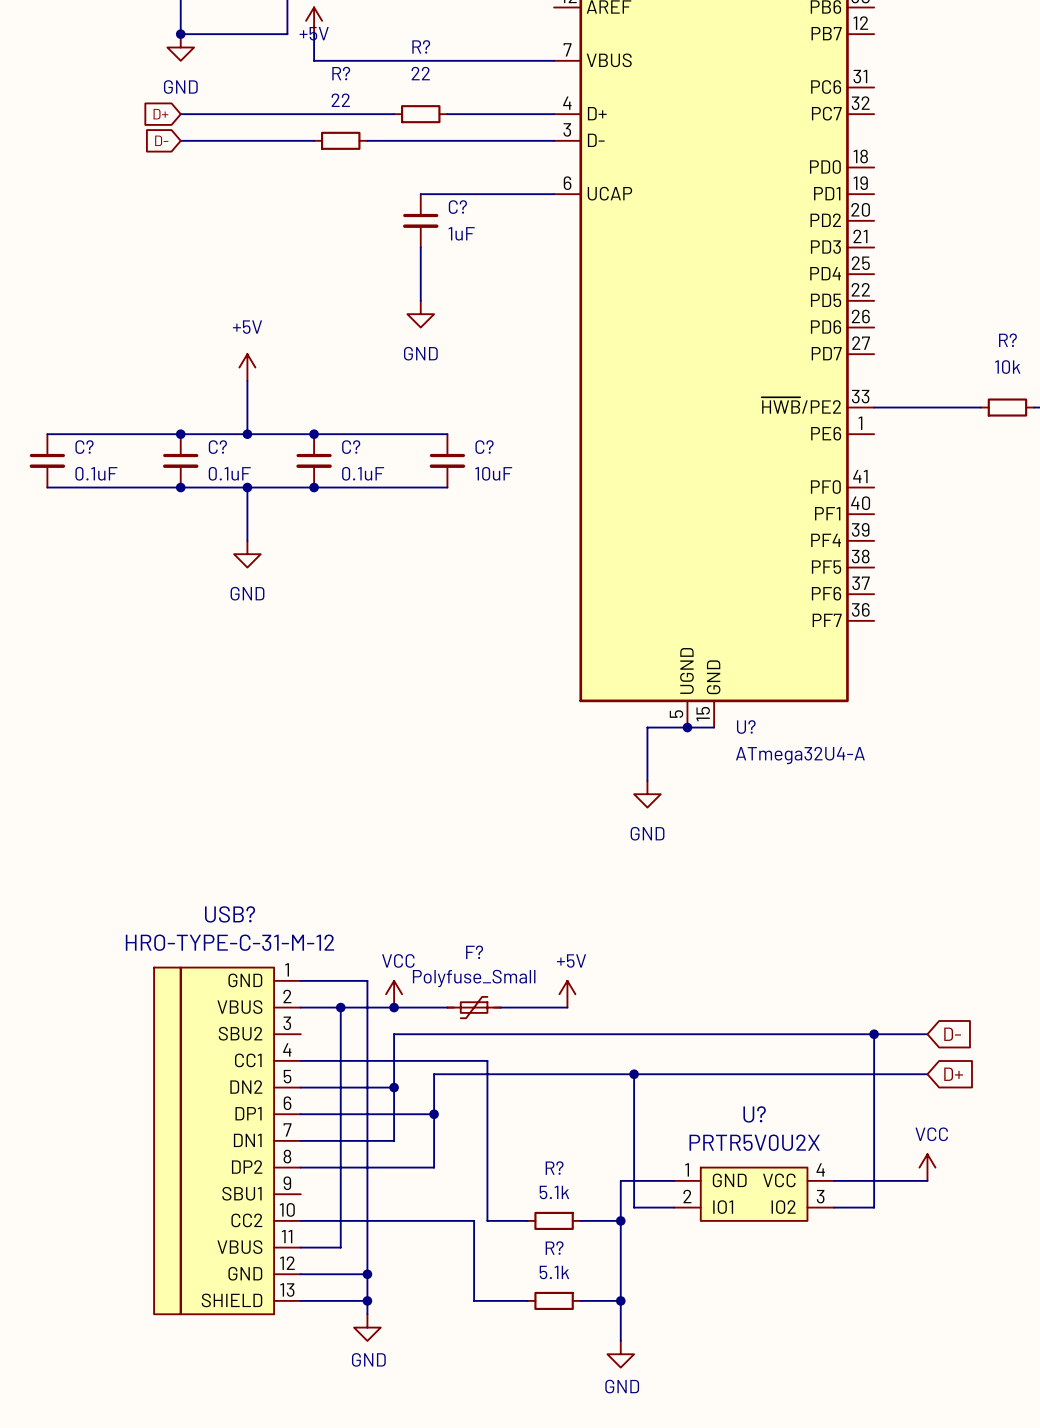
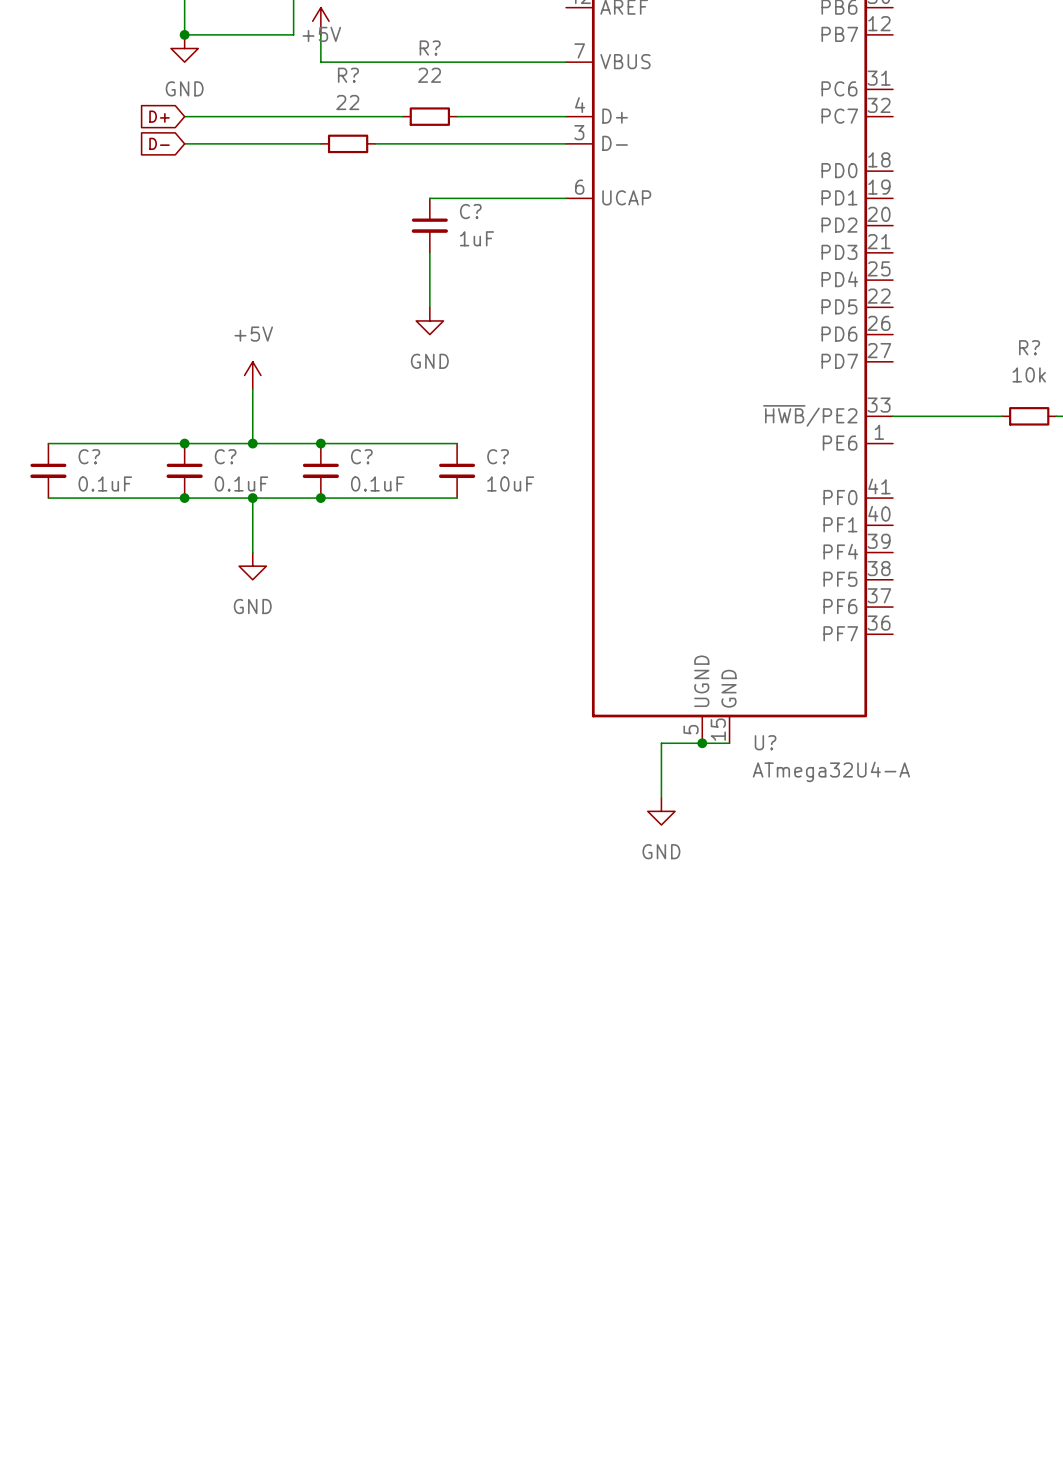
wire: (300, 980) (367, 980) (367, 1314) -> none
power symbol: VCC (394, 994) -> none
power symbol: +5V (567, 994) -> none
wire: (300, 1007) (447, 1007) -> none
wire: (340, 1007) (340, 1247) (300, 1247) -> none
junction: (340, 1007) -> none
junction: (394, 1007) -> none
F?: Polyfuse_Small (474, 1007) -> none
wire: (500, 1007) (567, 1007) -> none
wire: (874, 1034) (874, 1207) (834, 1207) -> none
junction: (874, 1034) -> none
wire: (927, 1034) (394, 1034) (394, 1140) (300, 1140) -> none
global label: D- (952, 1034) -> none
wire: (300, 1060) (487, 1060) (487, 1220) (527, 1220) -> none
wire: (634, 1074) (634, 1207) (674, 1207) -> none
junction: (634, 1074) -> none
wire: (927, 1074) (434, 1074) (434, 1167) (300, 1167) -> none
global label: D+ (953, 1074) -> none
wire: (300, 1087) (394, 1087) -> none
junction: (394, 1087) -> none
wire: (300, 1114) (434, 1114) -> none
junction: (434, 1114) -> none
USB?: HRO-TYPE-C-31-M-12 (227, 1140) -> none
power symbol: VCC (927, 1167) -> none
wire: (674, 1180) (620, 1180) (620, 1340) -> none
wire: (834, 1180) (927, 1180) -> none
U?: PRTR5V0U2X (754, 1194) -> none
wire: (300, 1220) (474, 1220) (474, 1300) (527, 1300) -> none
R?: 5.1k (554, 1220) -> none
wire: (580, 1220) (620, 1220) -> none
junction: (620, 1220) -> none
wire: (300, 1274) (367, 1274) -> none
junction: (367, 1274) -> none
wire: (300, 1300) (367, 1300) -> none
junction: (367, 1300) -> none
R?: 5.1k (554, 1300) -> none
wire: (580, 1300) (620, 1300) -> none
junction: (620, 1300) -> none
power symbol: GND (367, 1327) -> none
power symbol: GND (620, 1354) -> none

